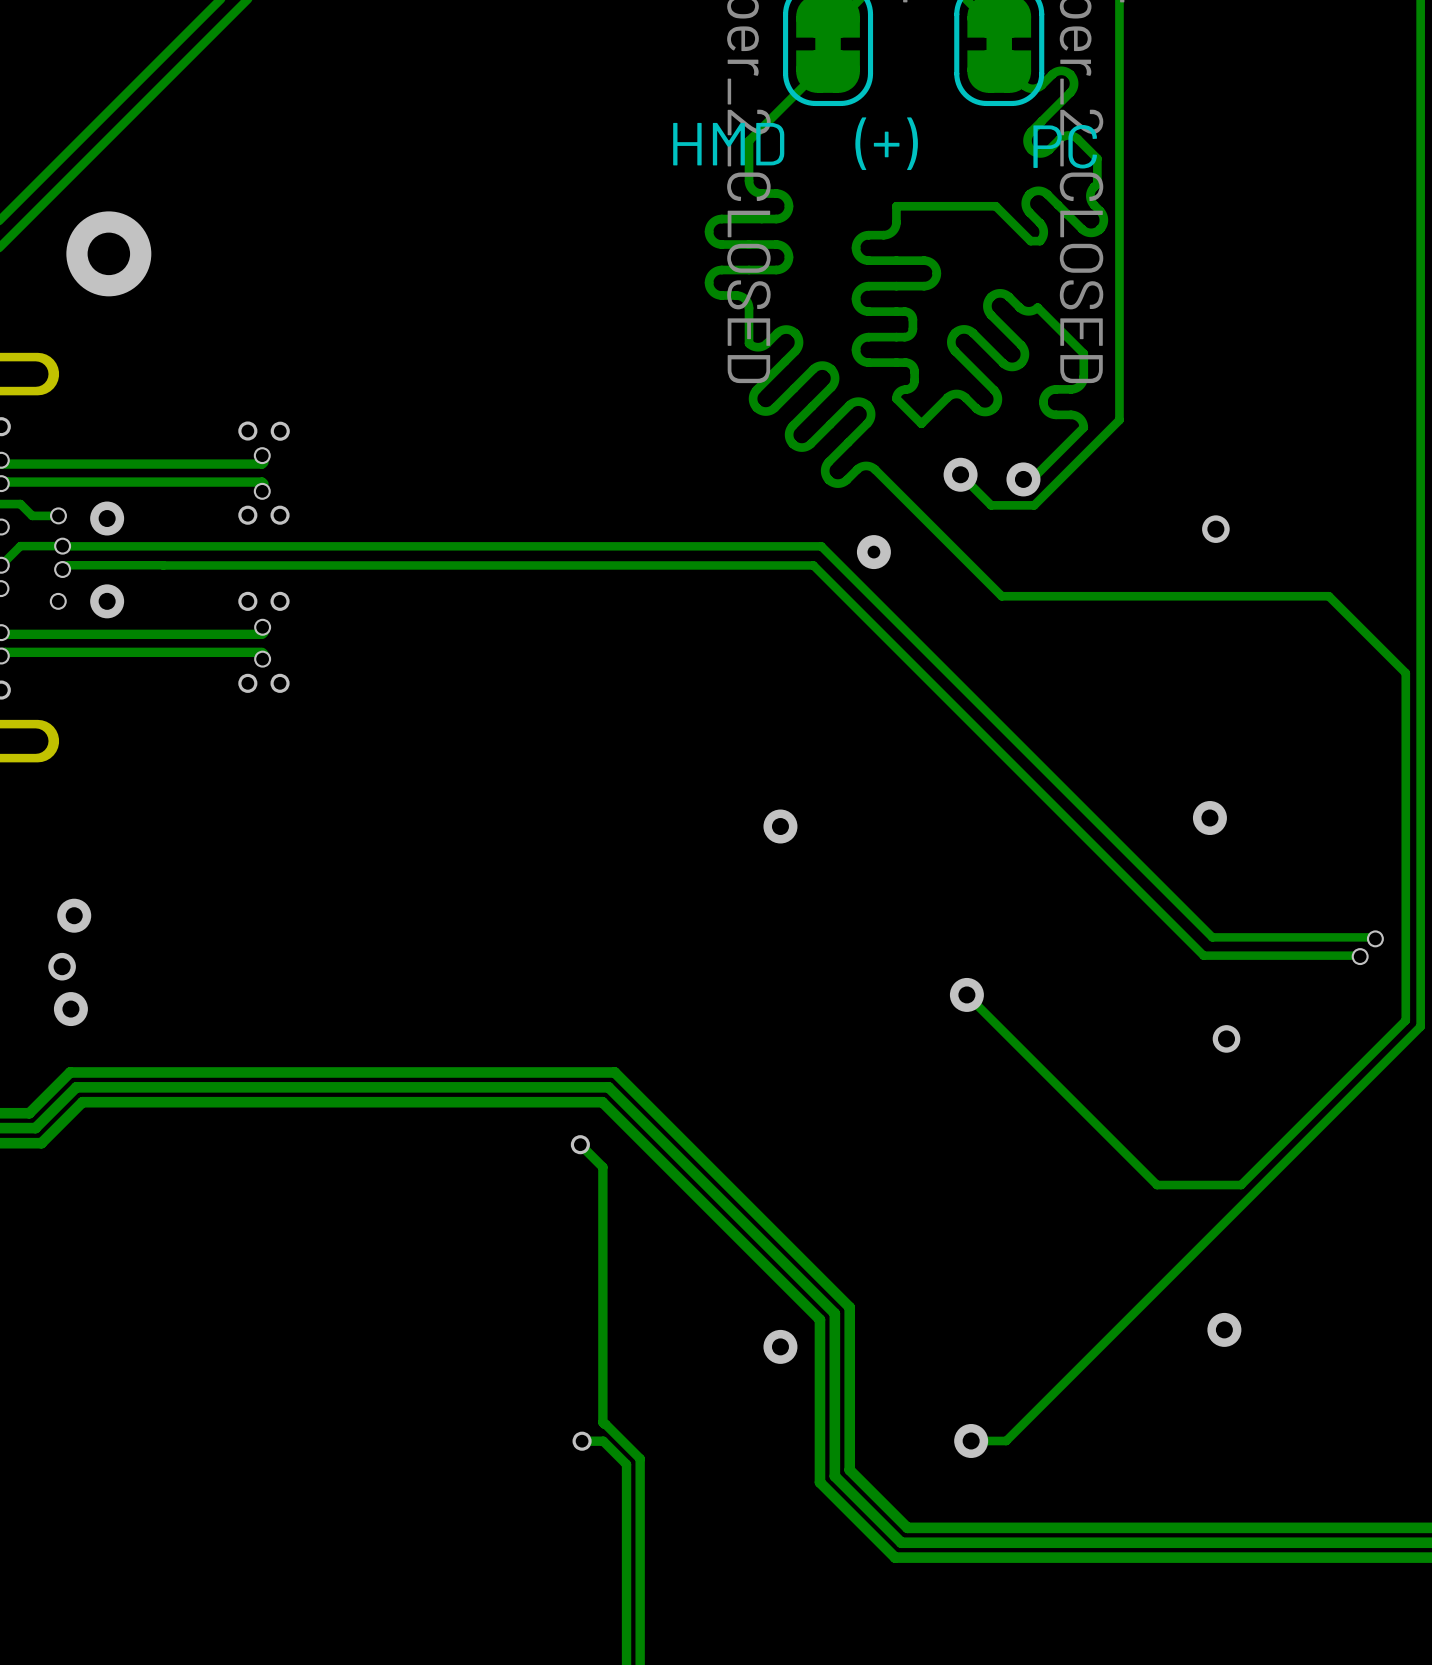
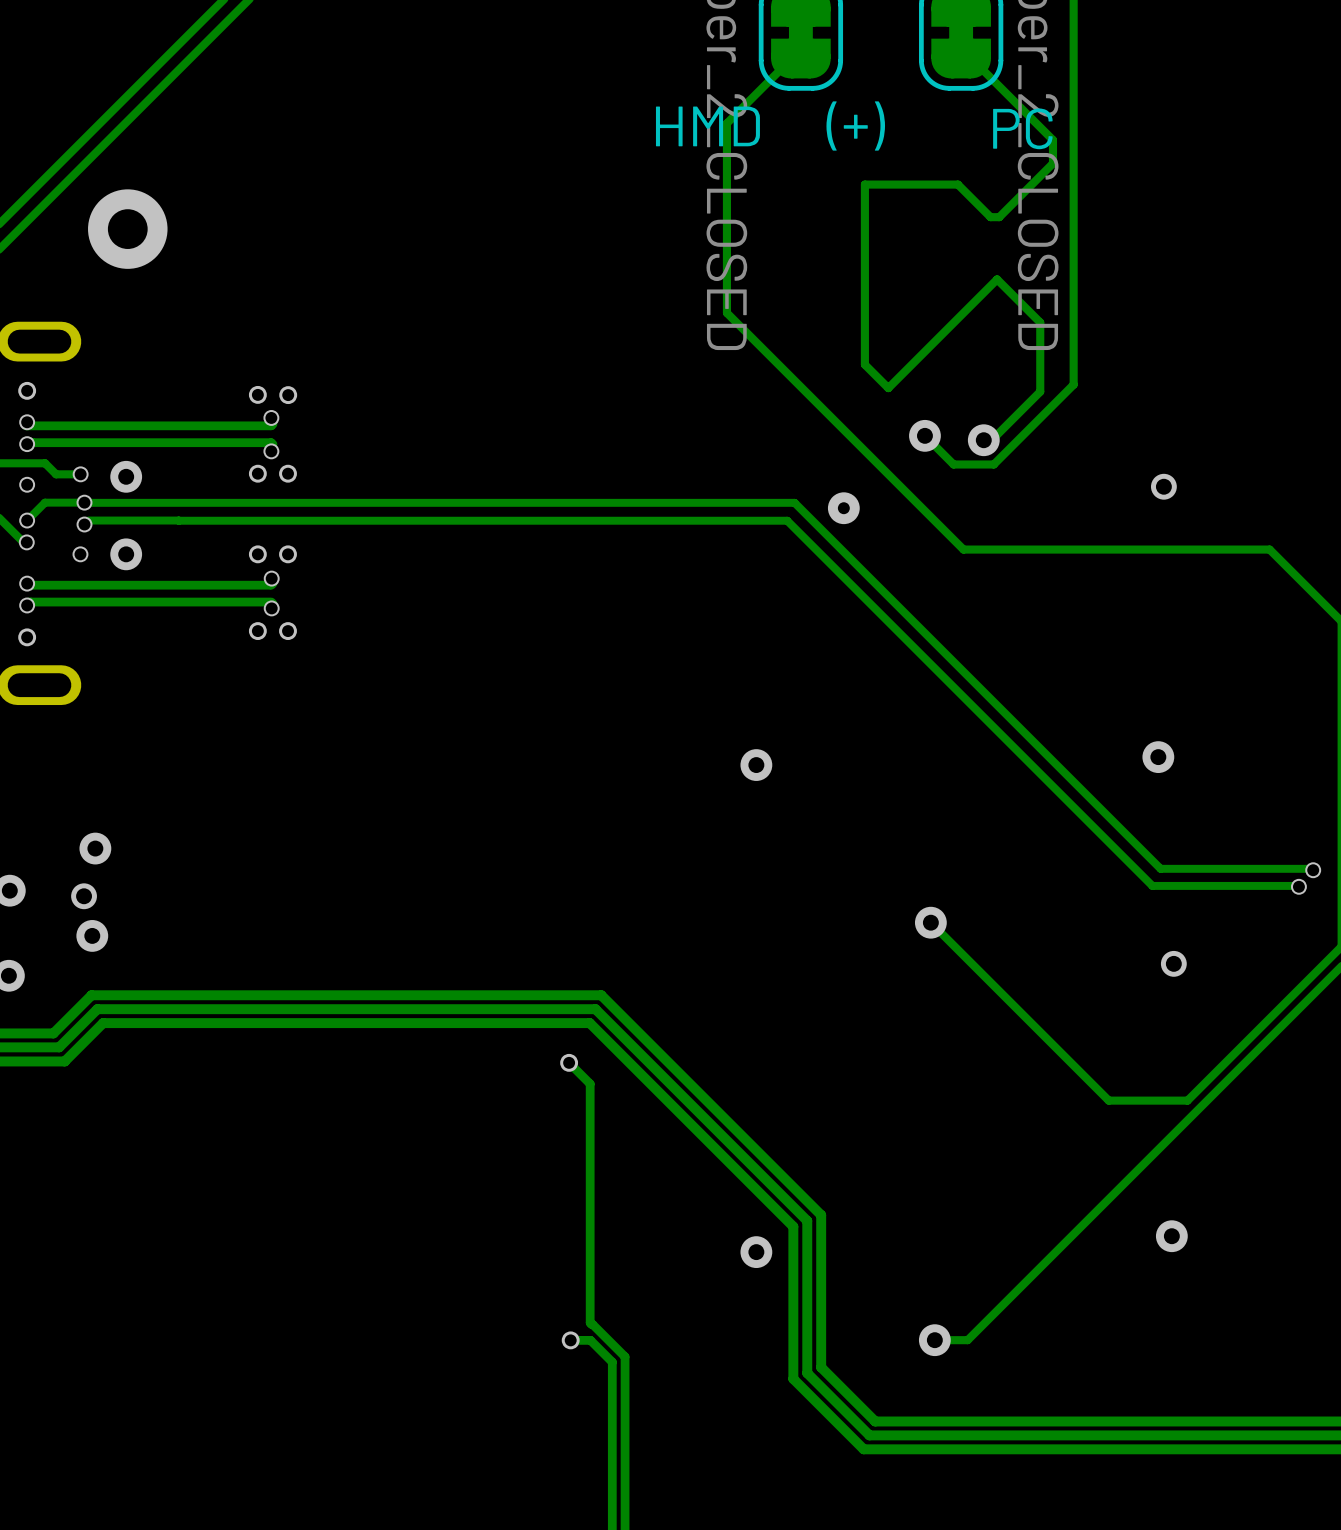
track: (1023, 85) (1029, 88) (1036, 88) (1053, 73) (1059, 70) (1069, 73) (1074, 82) (1071, 91) (1029, 133) (1027, 142) (1031, 149) (1036, 152) (1043, 153) (1064, 136) (1071, 135) (1077, 139) -> (984, 71) (1034, 121)
track: (749, 180) (751, 188) (756, 192) (777, 193) (785, 197) (788, 206) (786, 214) (777, 218) (718, 219) (711, 224) (709, 231) (711, 239) (718, 244) (777, 244) (787, 250) (788, 262) (779, 269) (720, 270) (710, 276) (709, 284) (714, 292) (720, 295) (741, 296) (746, 300) (749, 308) -> (726, 160) (726, 279)
track: (1094, 187) (1090, 193) (1091, 200) (1101, 213) (1103, 220) (1101, 228) (1092, 232) (1083, 230) (1045, 192) (1037, 190) (1029, 194) (1026, 199) (1026, 206) (1043, 227) (1043, 234) (1040, 241) -> (1049, 166) (999, 217)
track: (896, 222) (893, 230) (888, 234) (862, 236) (857, 241) (856, 247) (858, 255) (865, 260) (925, 260) (933, 264) (936, 270) (935, 279) (927, 285) (867, 286) (859, 289) (856, 295) (857, 303) (863, 310) (905, 311) (912, 316) (912, 329) (908, 336) (865, 337) (859, 340) (856, 348) (857, 356) (865, 362) (906, 362) (912, 366) (914, 370) (913, 384) (909, 388) (899, 391) (896, 398) -> (864, 199) (864, 364)
track: (1037, 307) (1031, 311) (1024, 310) (1008, 296) (1001, 293) (993, 295) (988, 301) (987, 307) (989, 313) (1023, 348) (1023, 359) (1016, 366) (1010, 366) (1004, 364) (970, 331) (962, 329) (955, 333) (951, 340) (953, 348) (995, 391) (997, 400) (993, 409) (983, 411) (977, 409) (960, 394) (953, 394) (947, 397) -> (997, 279) (912, 363)
track: (749, 343) (754, 346) (762, 346) (778, 332) (784, 329) (793, 331) (798, 339) (796, 350) (754, 393) (753, 402) (761, 410) (768, 411) (773, 408) (816, 366) (826, 366) (833, 372) (835, 379) (832, 386) (790, 429) (789, 439) (796, 446) (803, 447) (809, 444) (852, 402) (861, 401) (869, 407) (871, 415) (868, 422) (827, 464) (825, 472) (828, 479) (833, 482) (840, 483) (861, 466) (869, 466) (875, 469) -> (726, 312) (845, 431)
track: (1083, 376) (1082, 383) (1075, 388) (1049, 391) (1045, 395) (1043, 402) (1045, 408) (1051, 413) (1077, 416) (1082, 421) (1083, 427) -> (1040, 344) (1040, 391)

